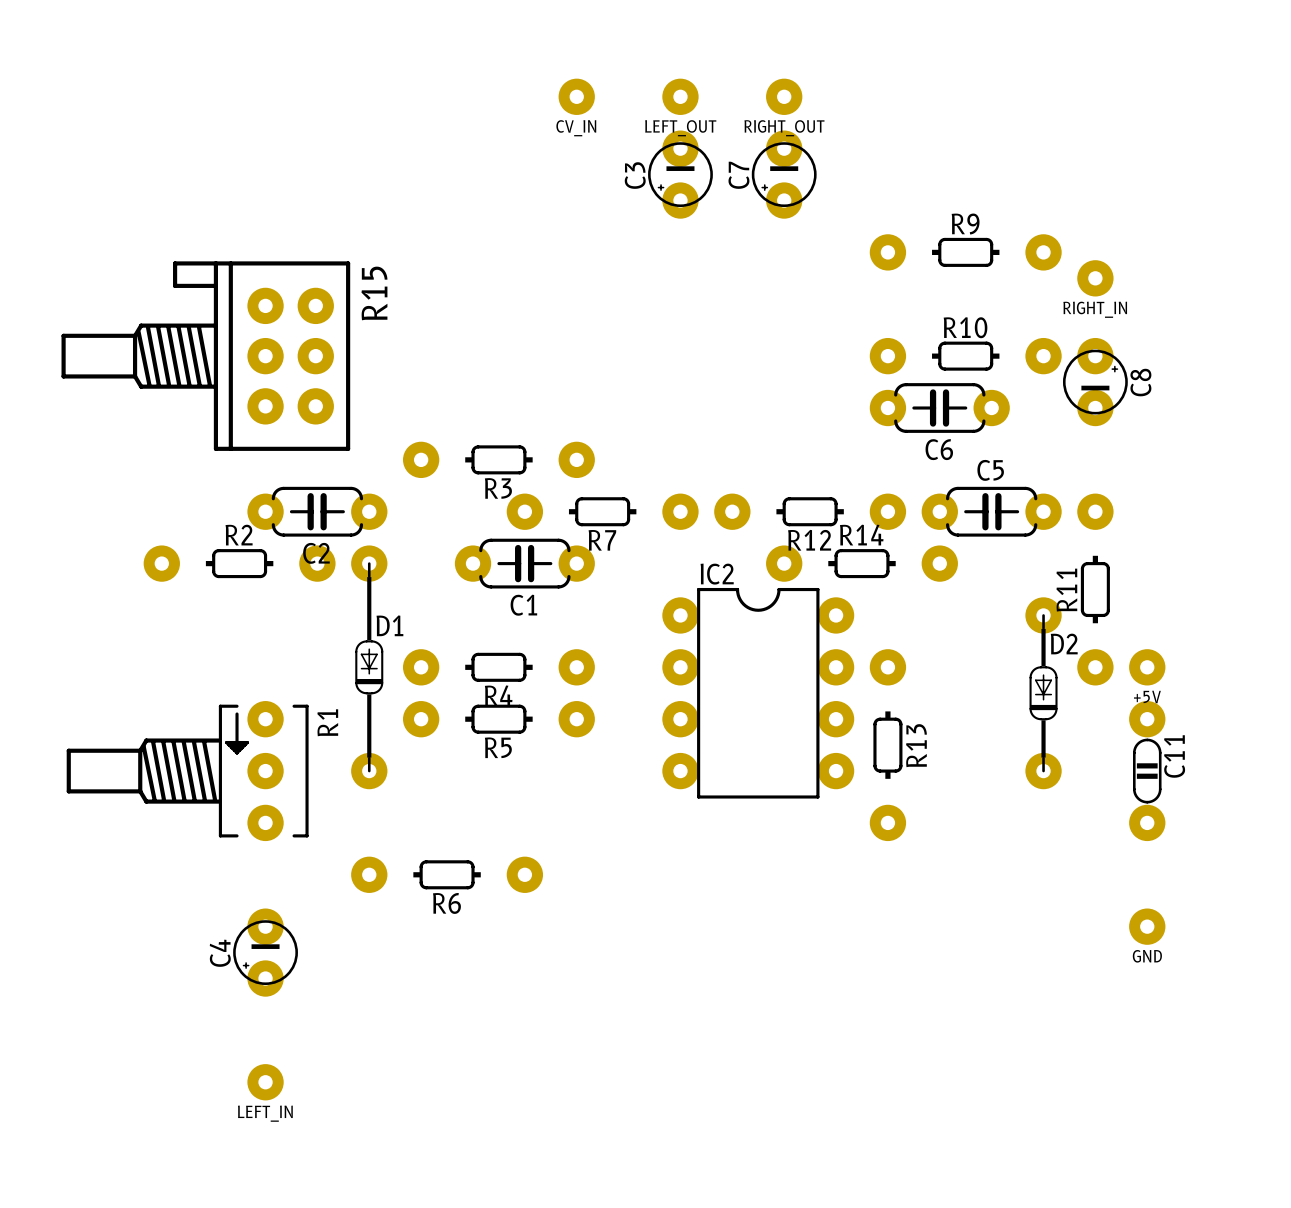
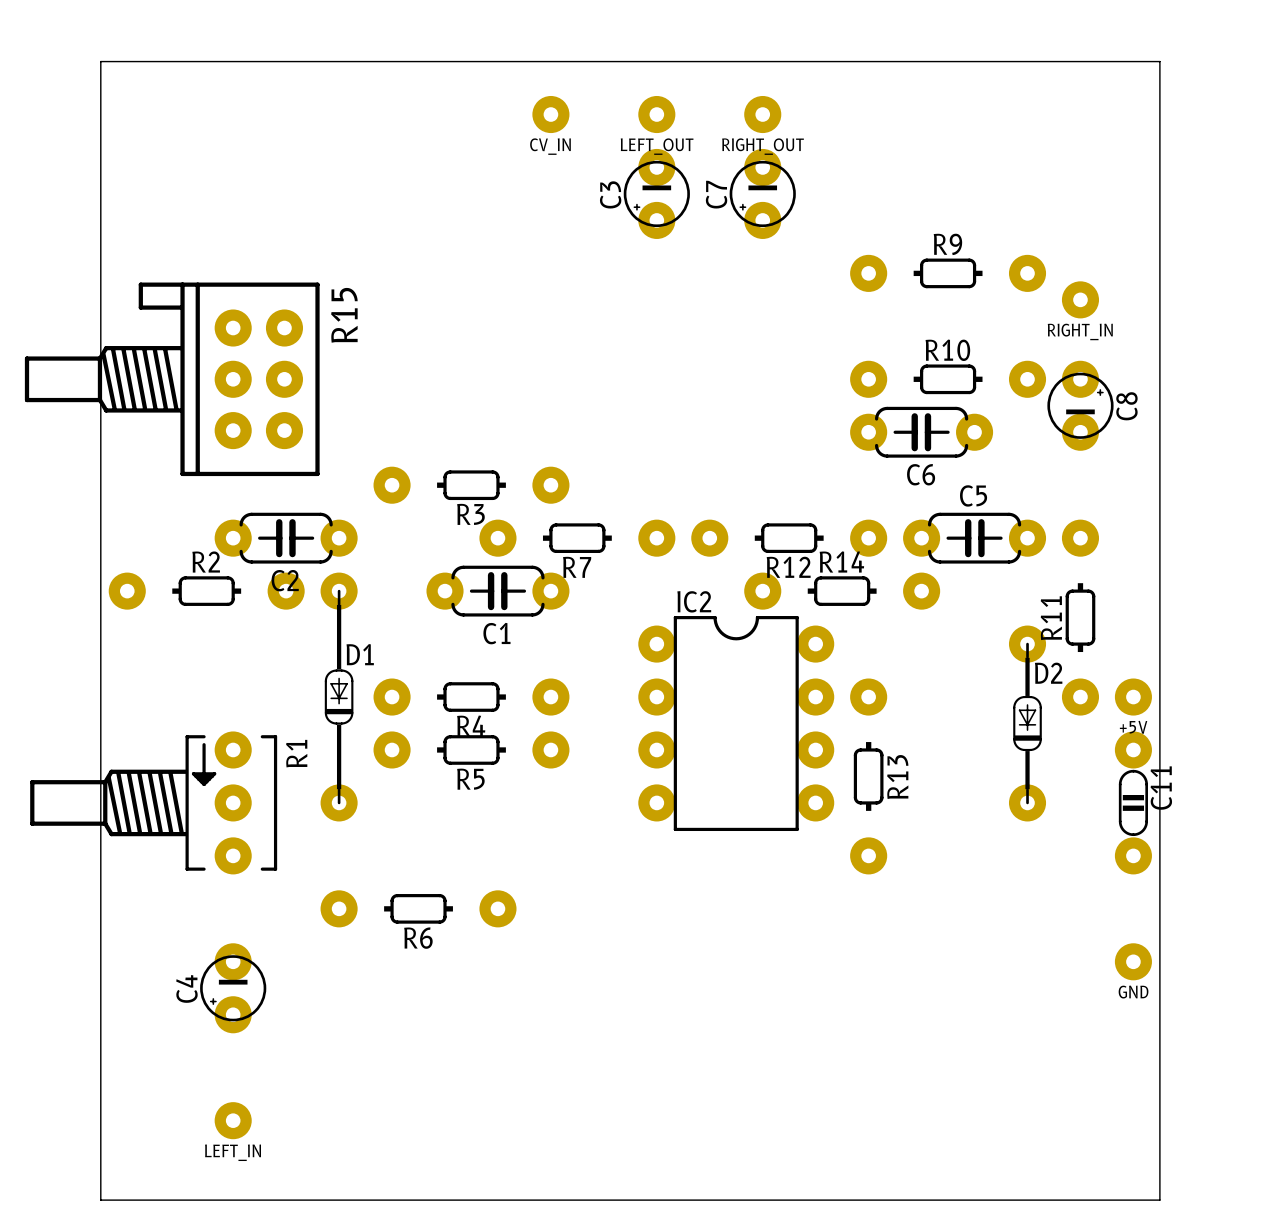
board edge: none -> (100, 61) (1159, 61) (1159, 1200) (100, 1200) (100, 61)

